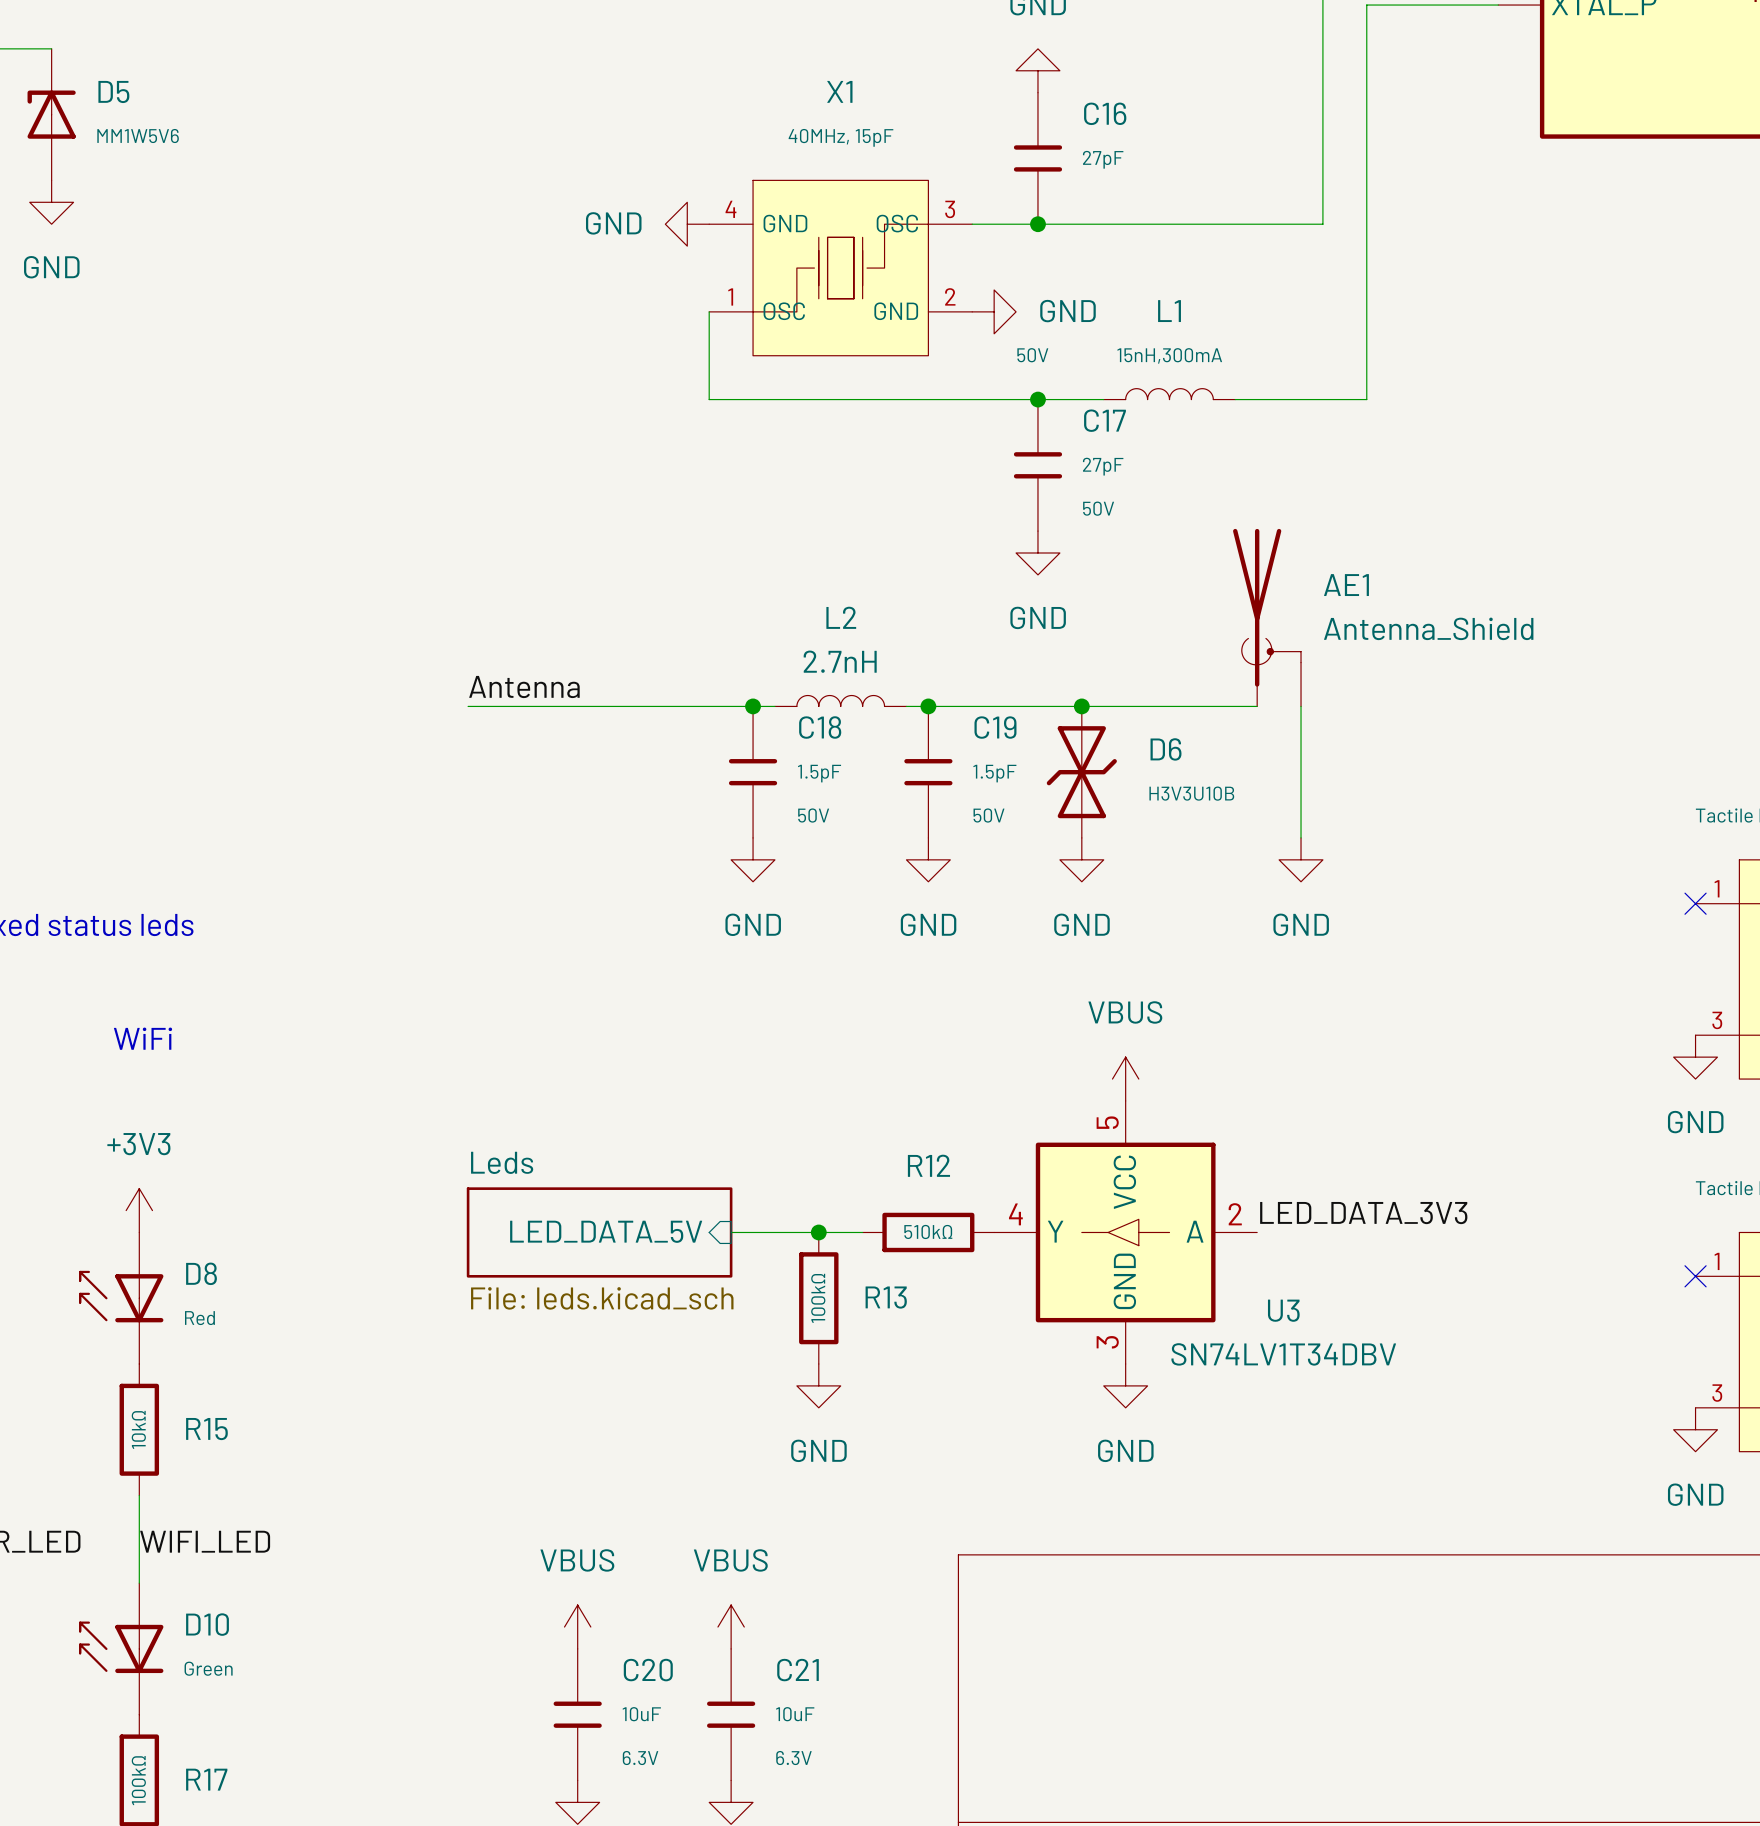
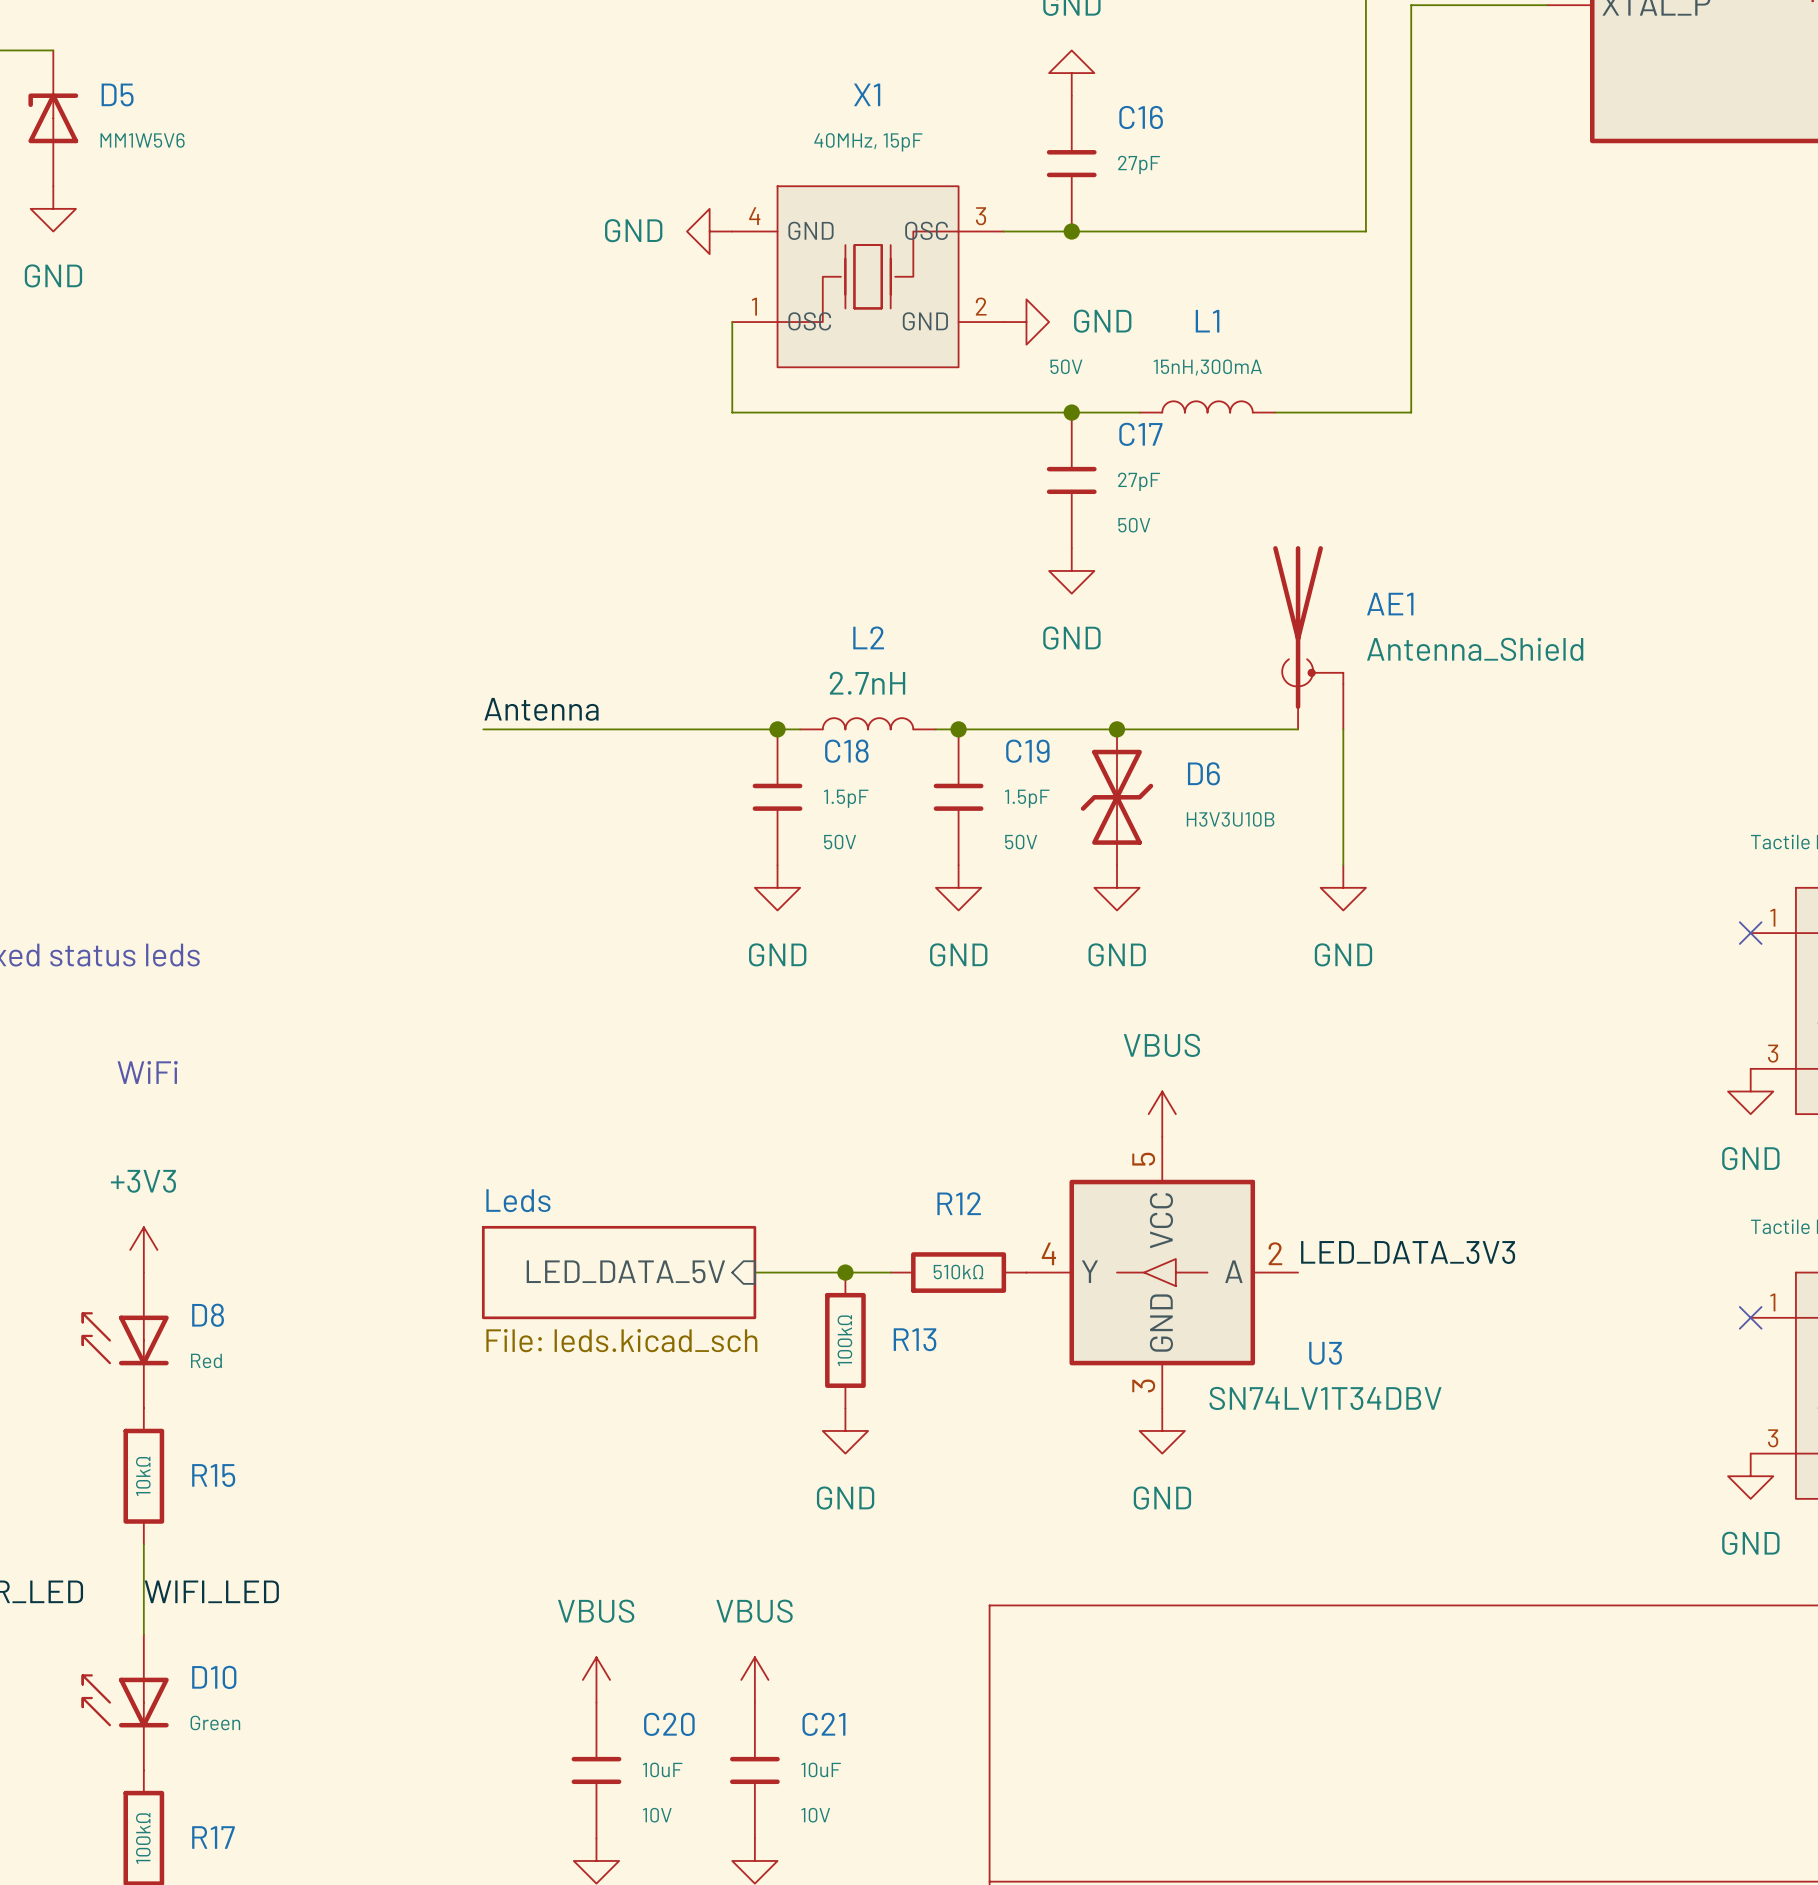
C20 text: 6.3V (640, 1758) -> 10V (657, 1815)
C21 text: 6.3V (793, 1758) -> 10V (815, 1815)

